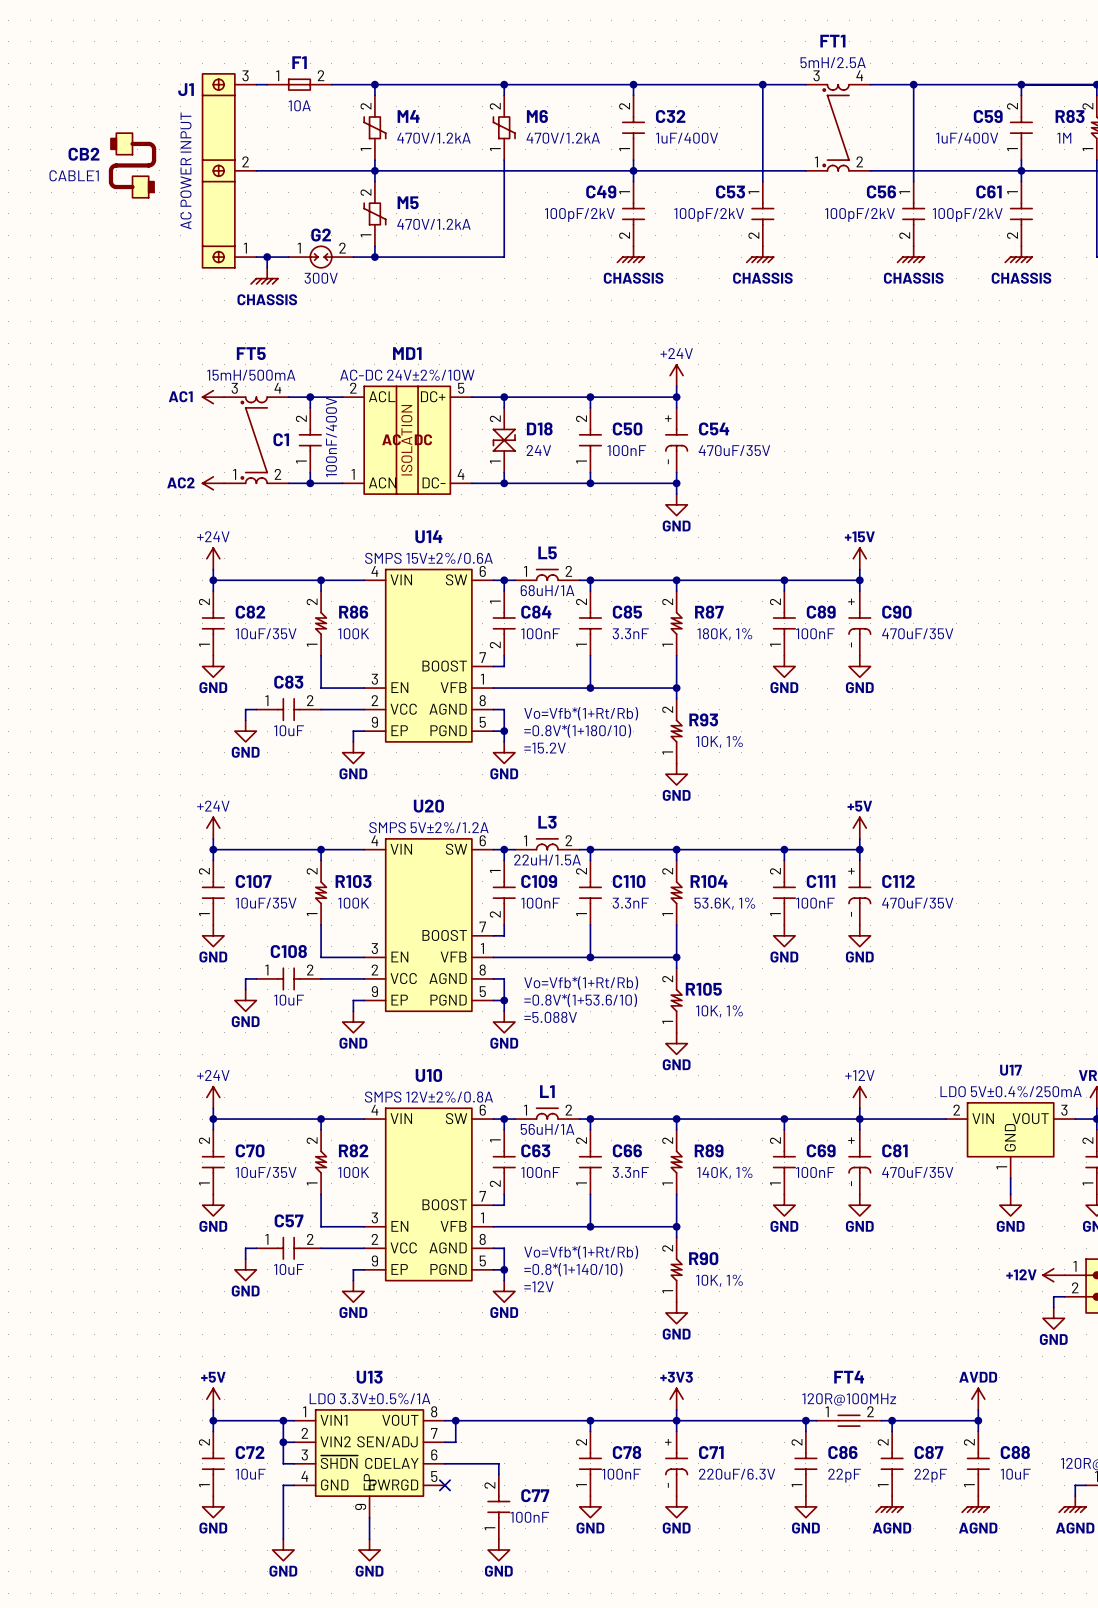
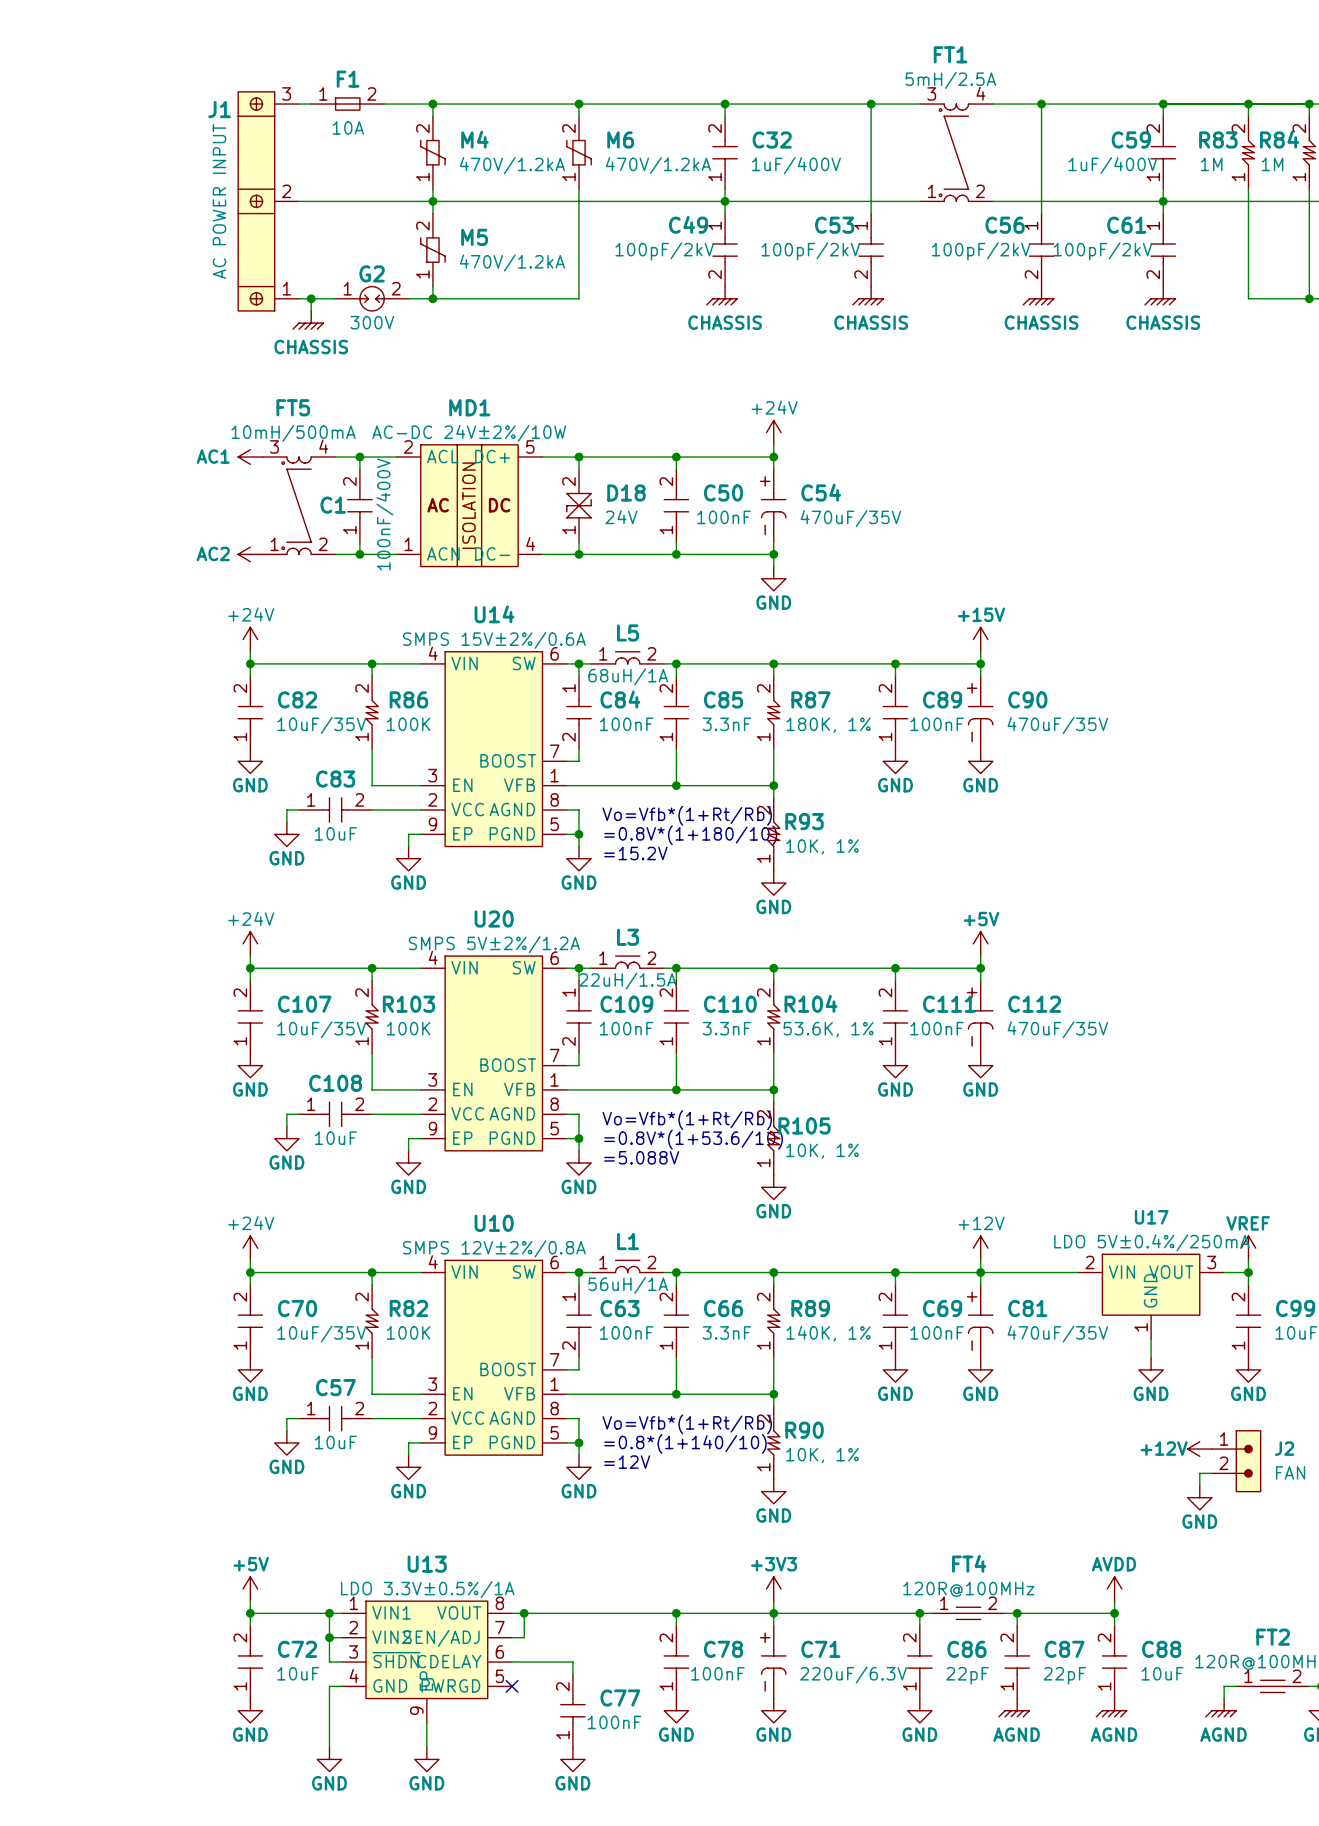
CB2: CABLE1 (132, 165) -> none
FT5 value: 15mH/500mA (251, 375) -> 10mH/500mA (293, 433)

